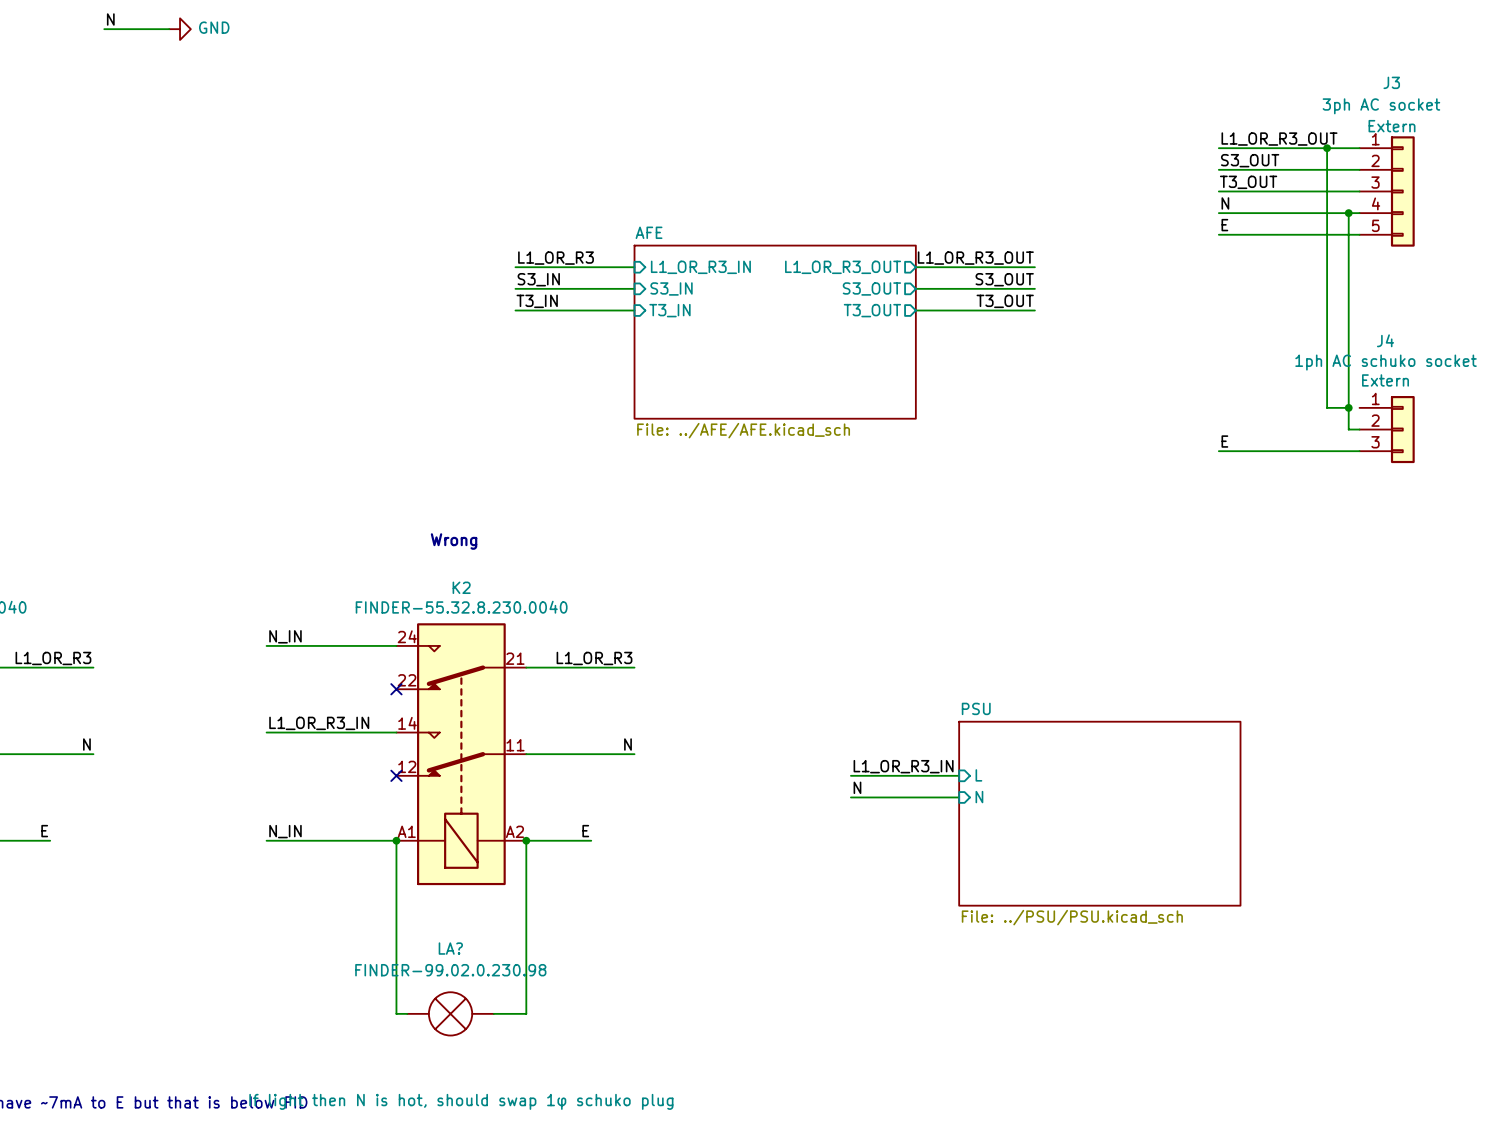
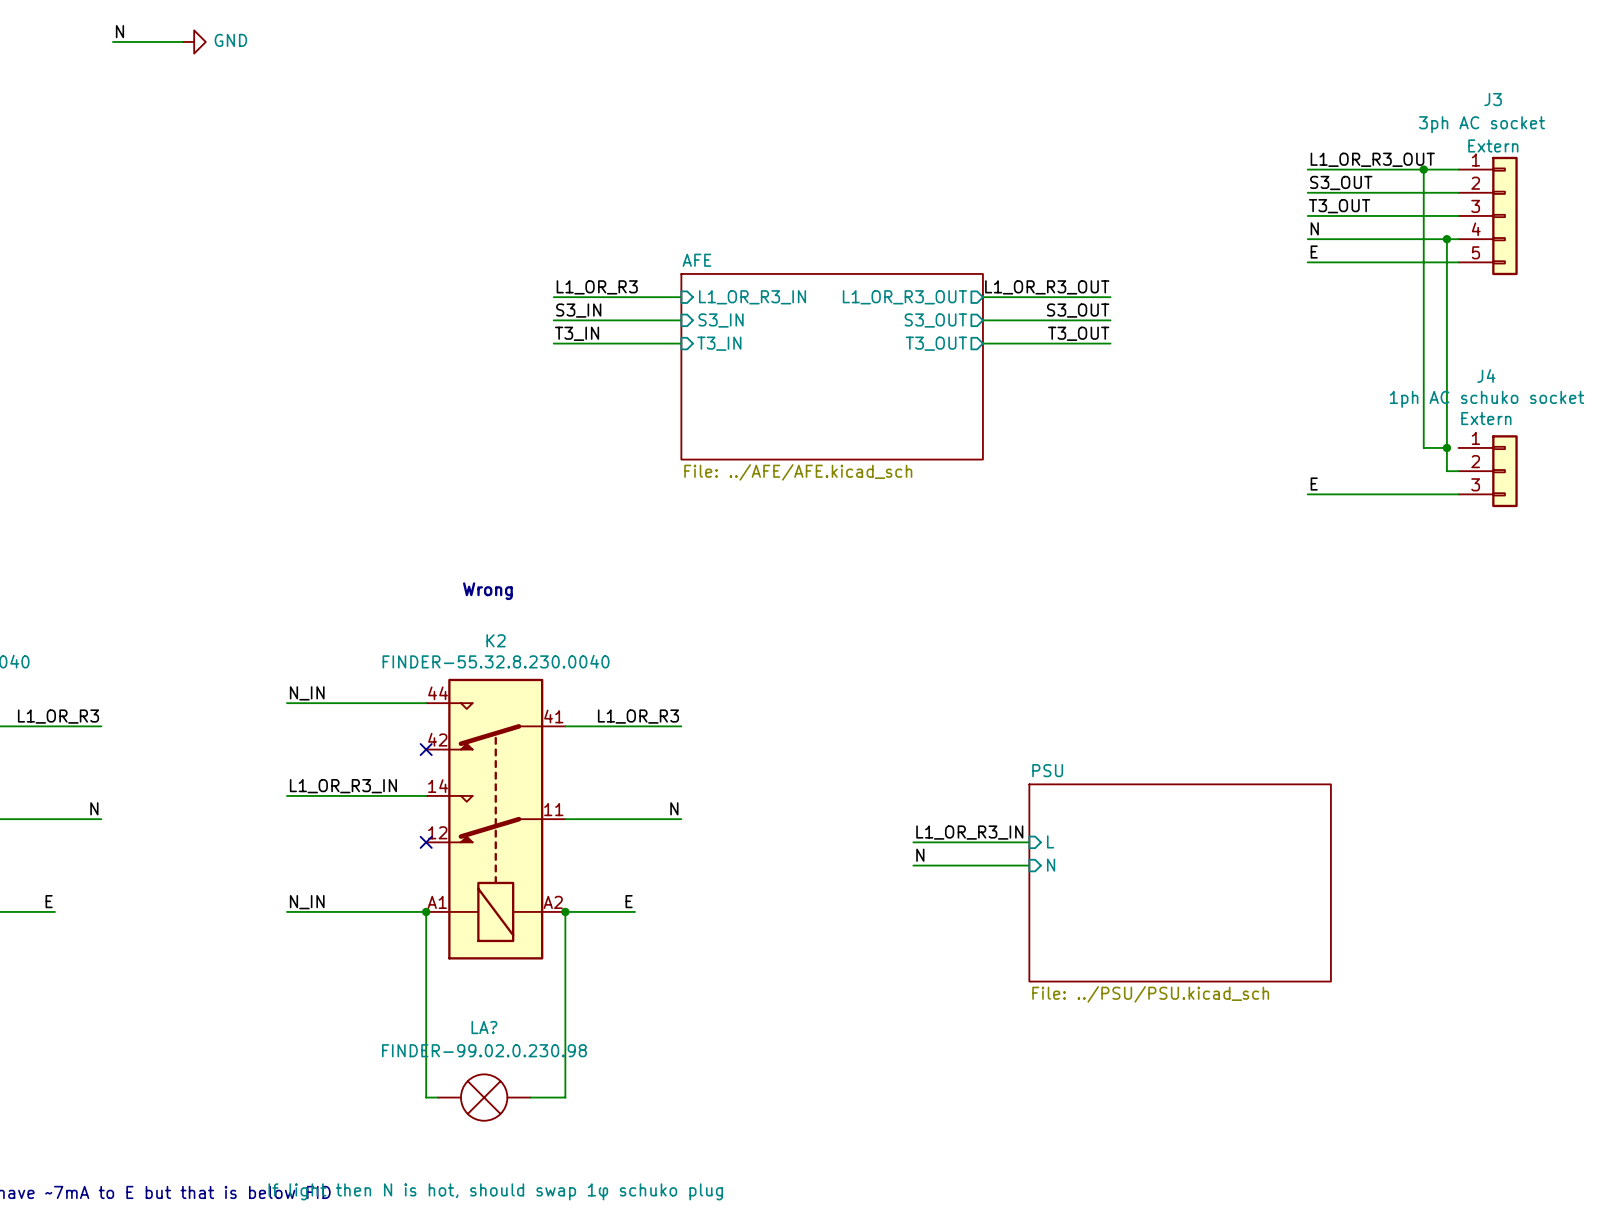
K2 pin number: 24 (407, 636) -> 44 (438, 693)
K2 pin number: 21 (515, 658) -> 41 (553, 716)
K2 pin number: 22 (407, 680) -> 42 (437, 739)

